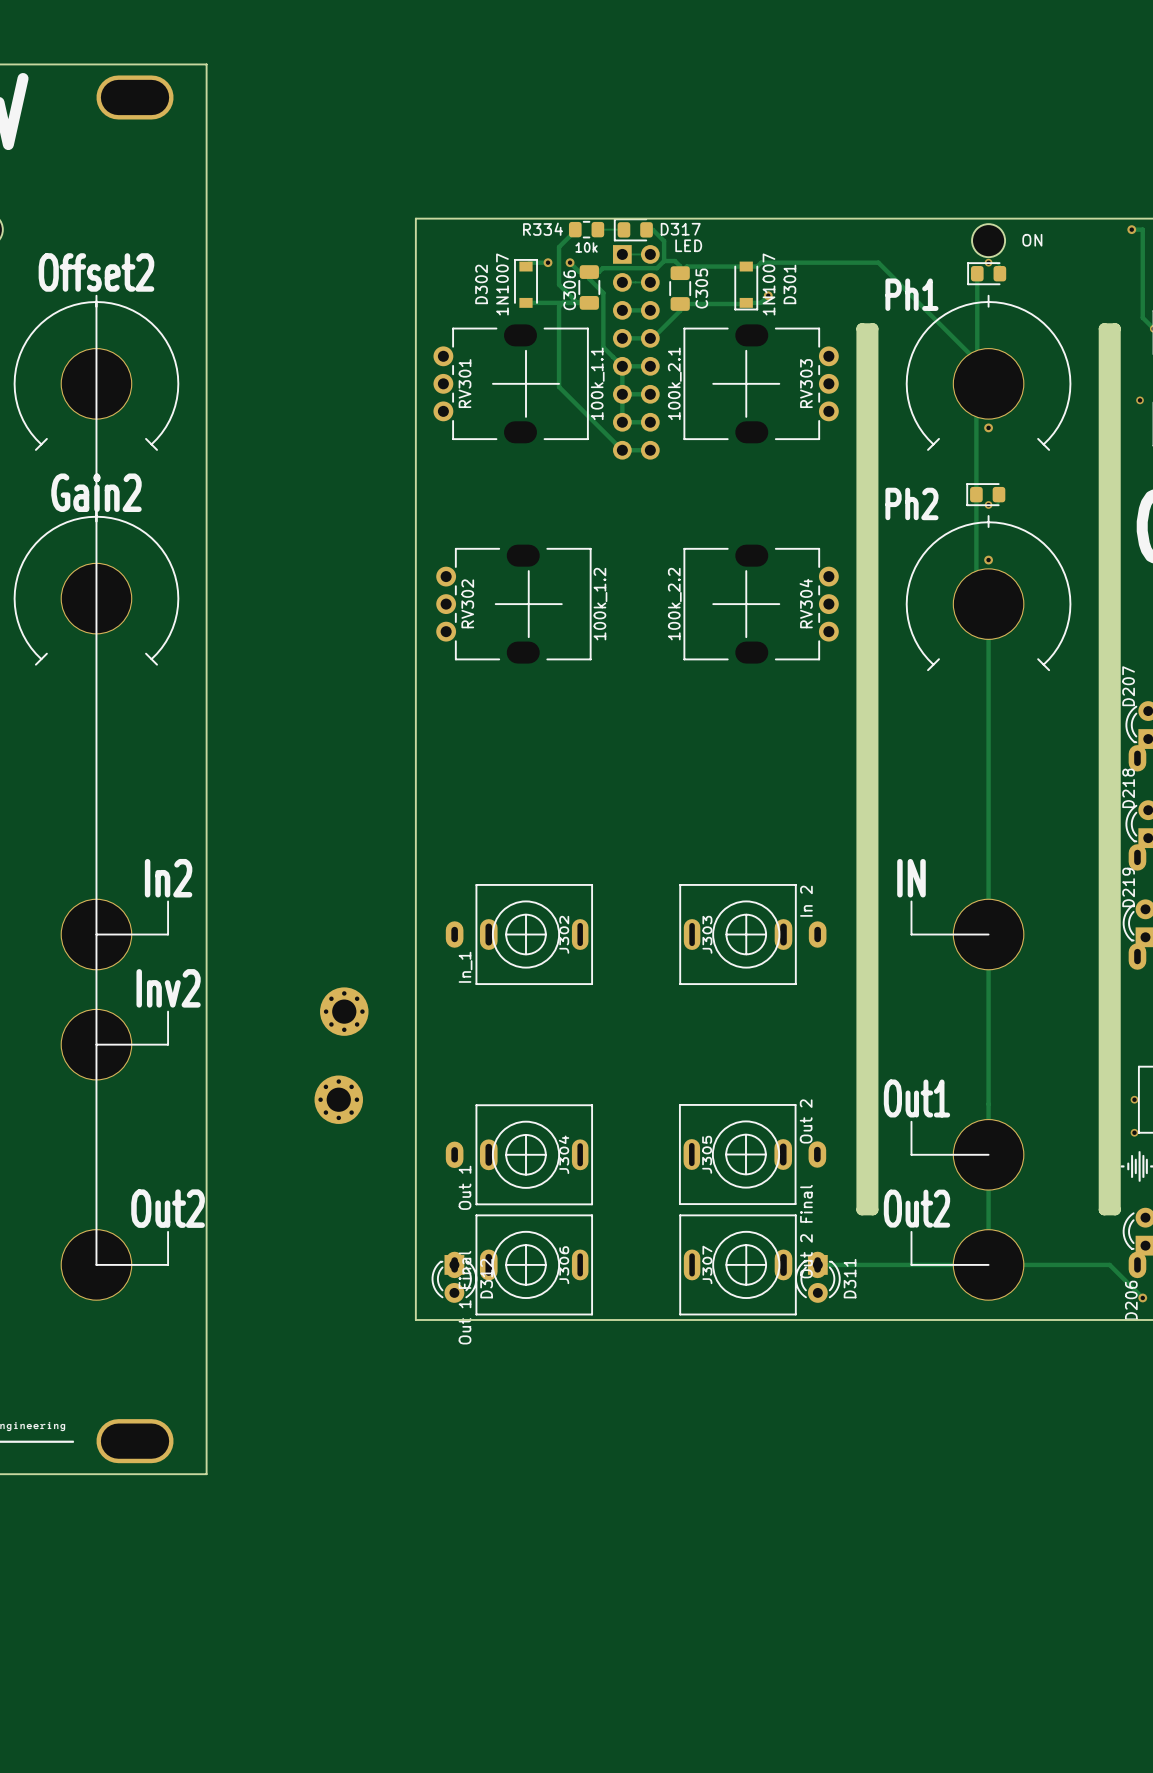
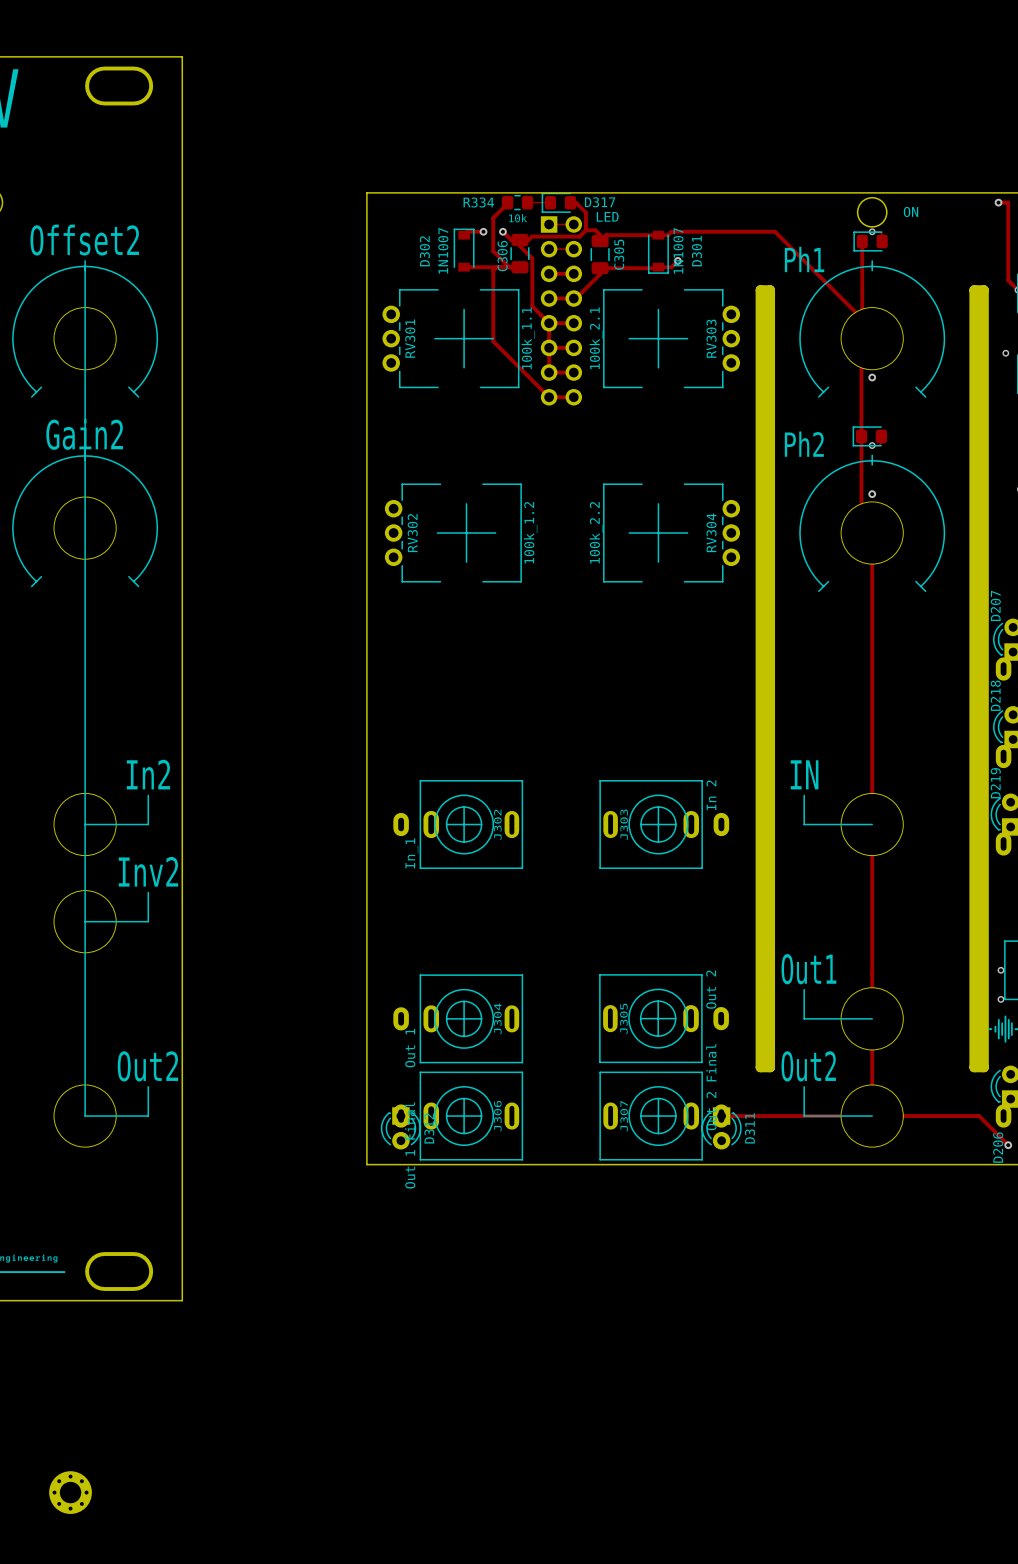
part: (344, 1011) -> none
part: (338, 1099) -> none
part: none -> (70, 1492)

